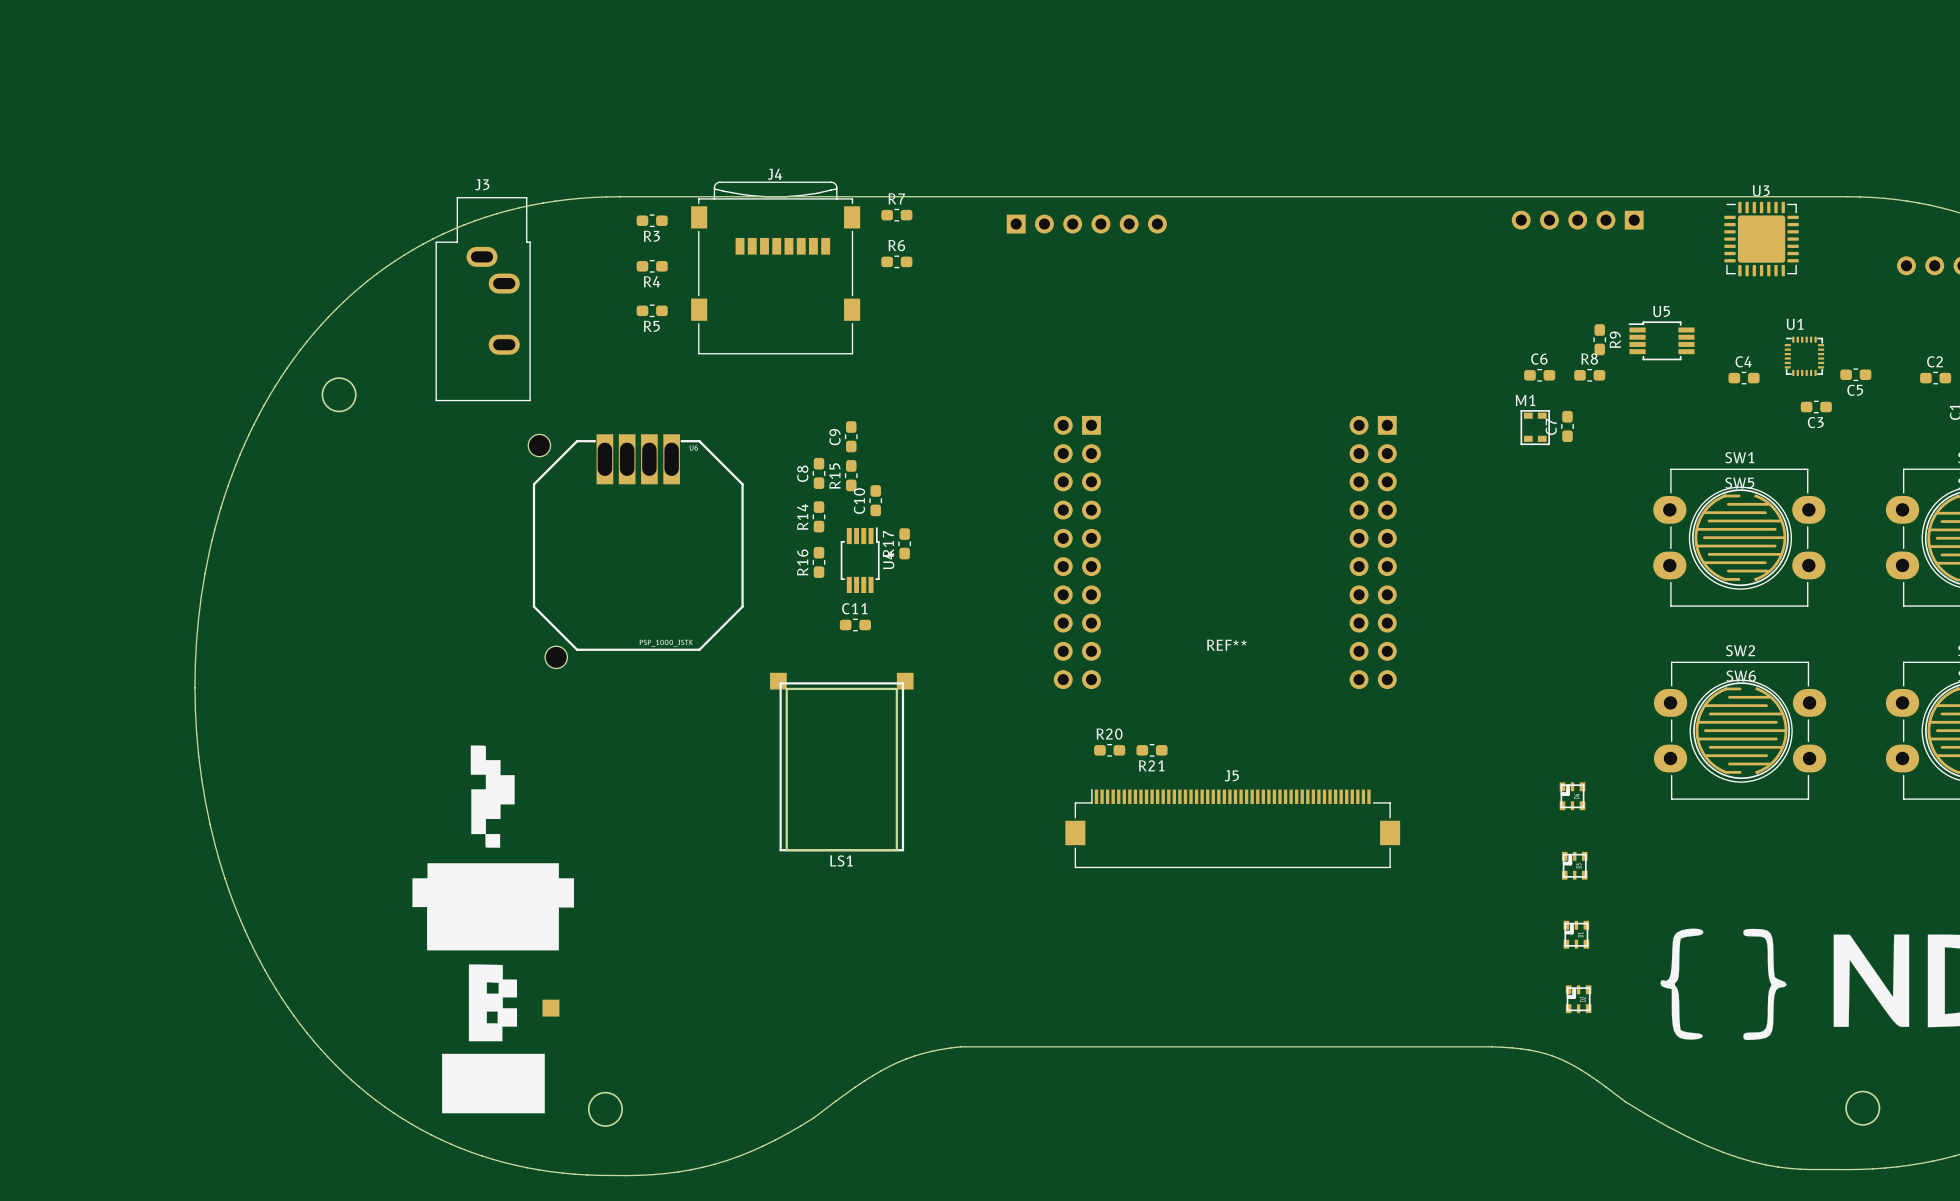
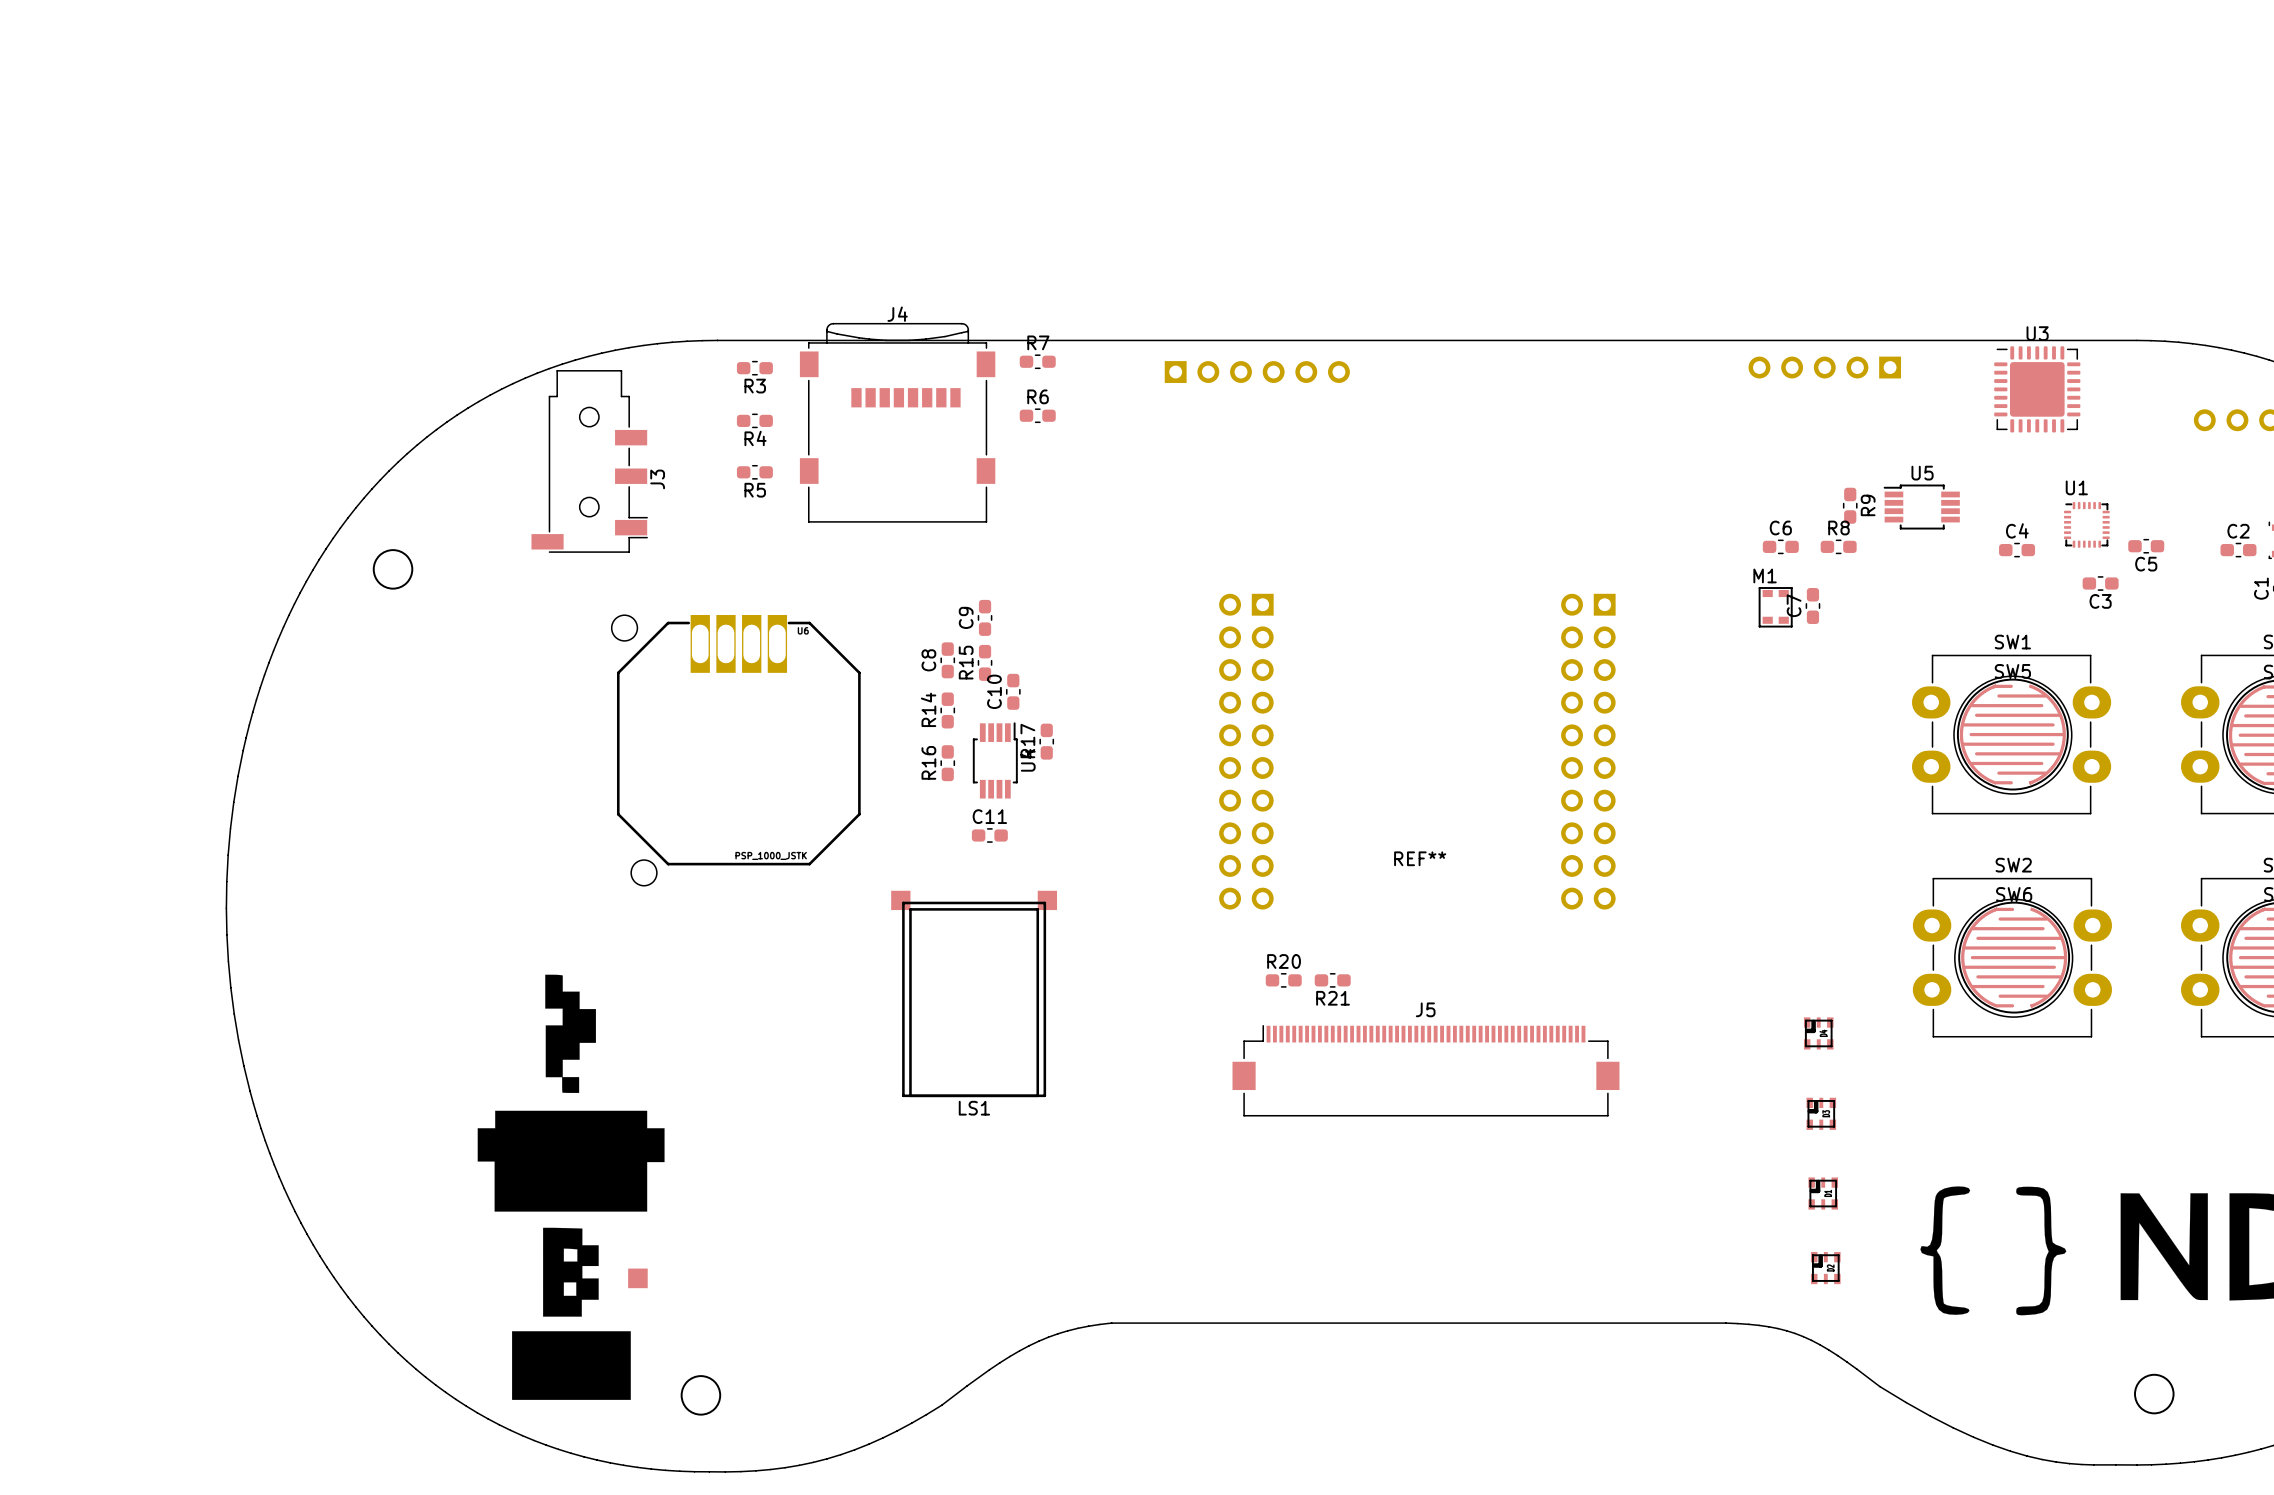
J3 name position: J3 (482, 184) -> J3 (657, 479)
J3 footprint: [435, 197, 531, 402] -> [531, 370, 648, 553]

